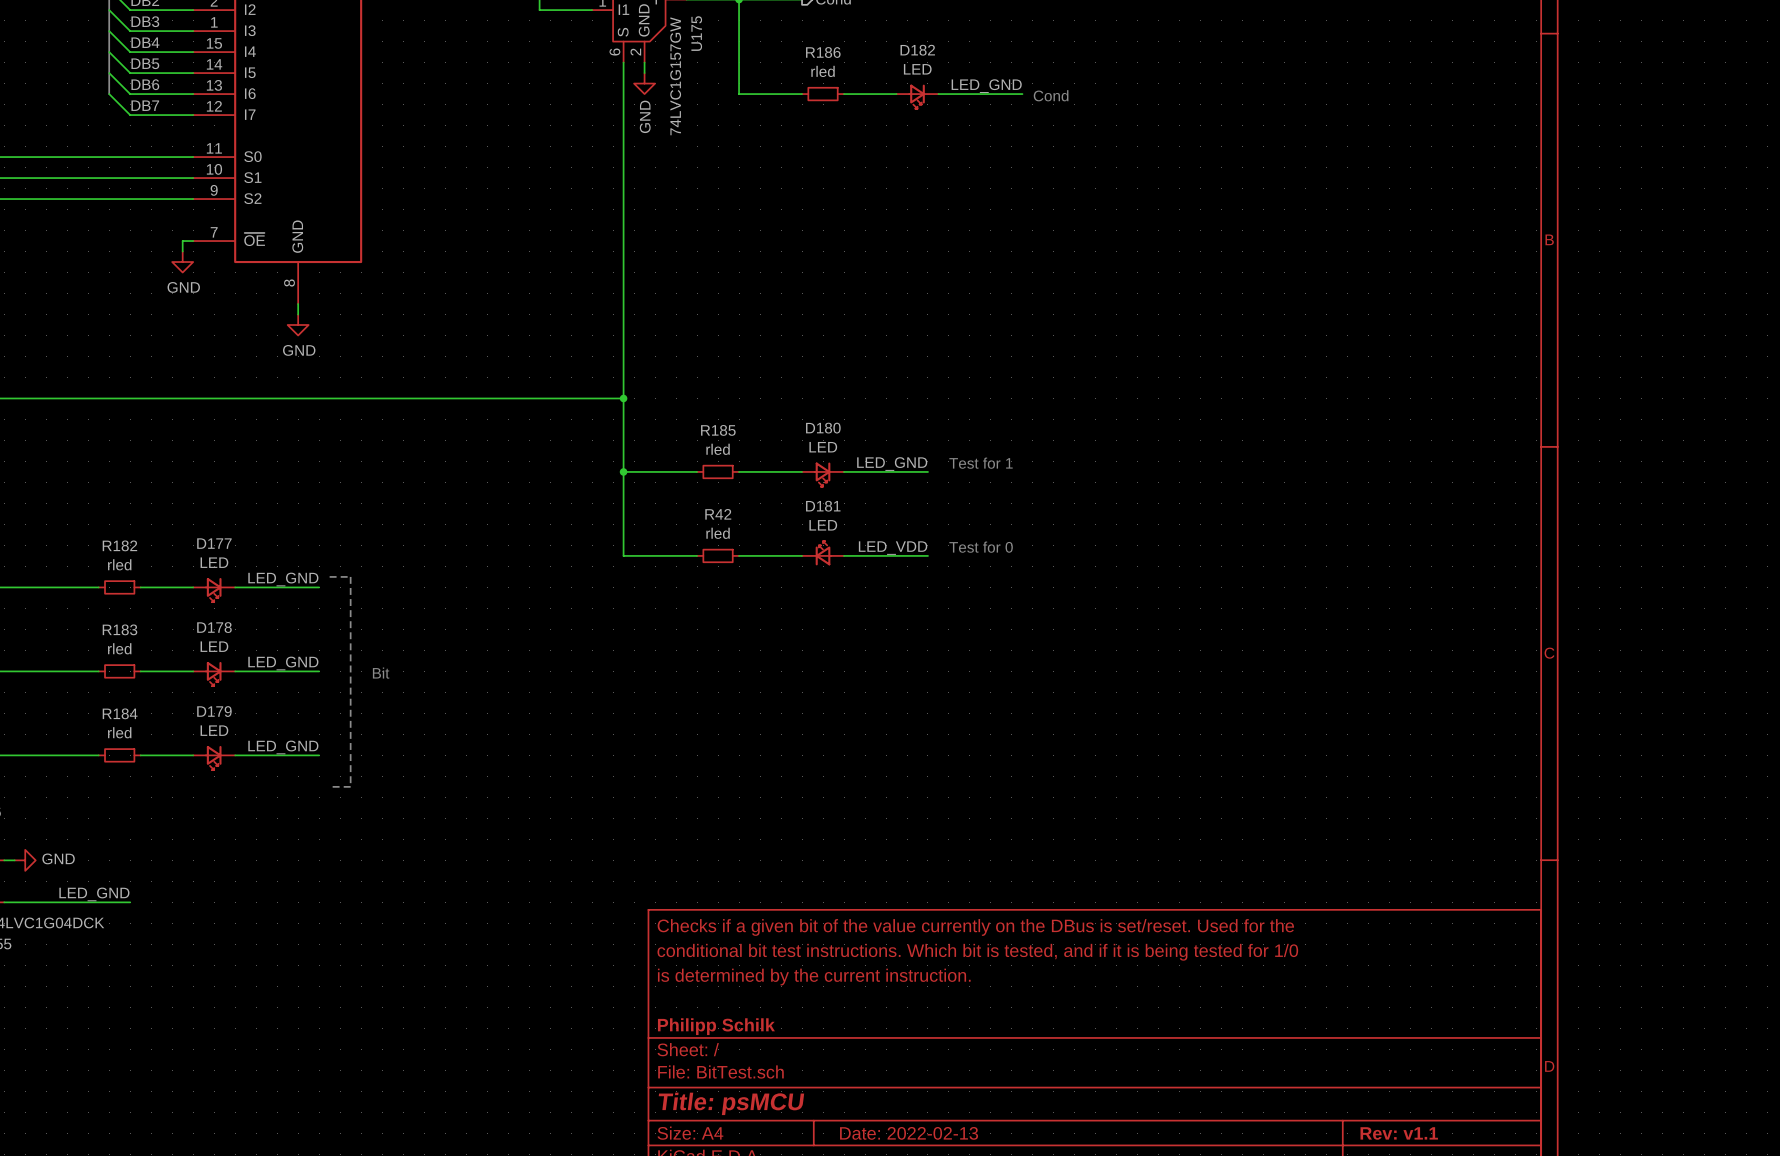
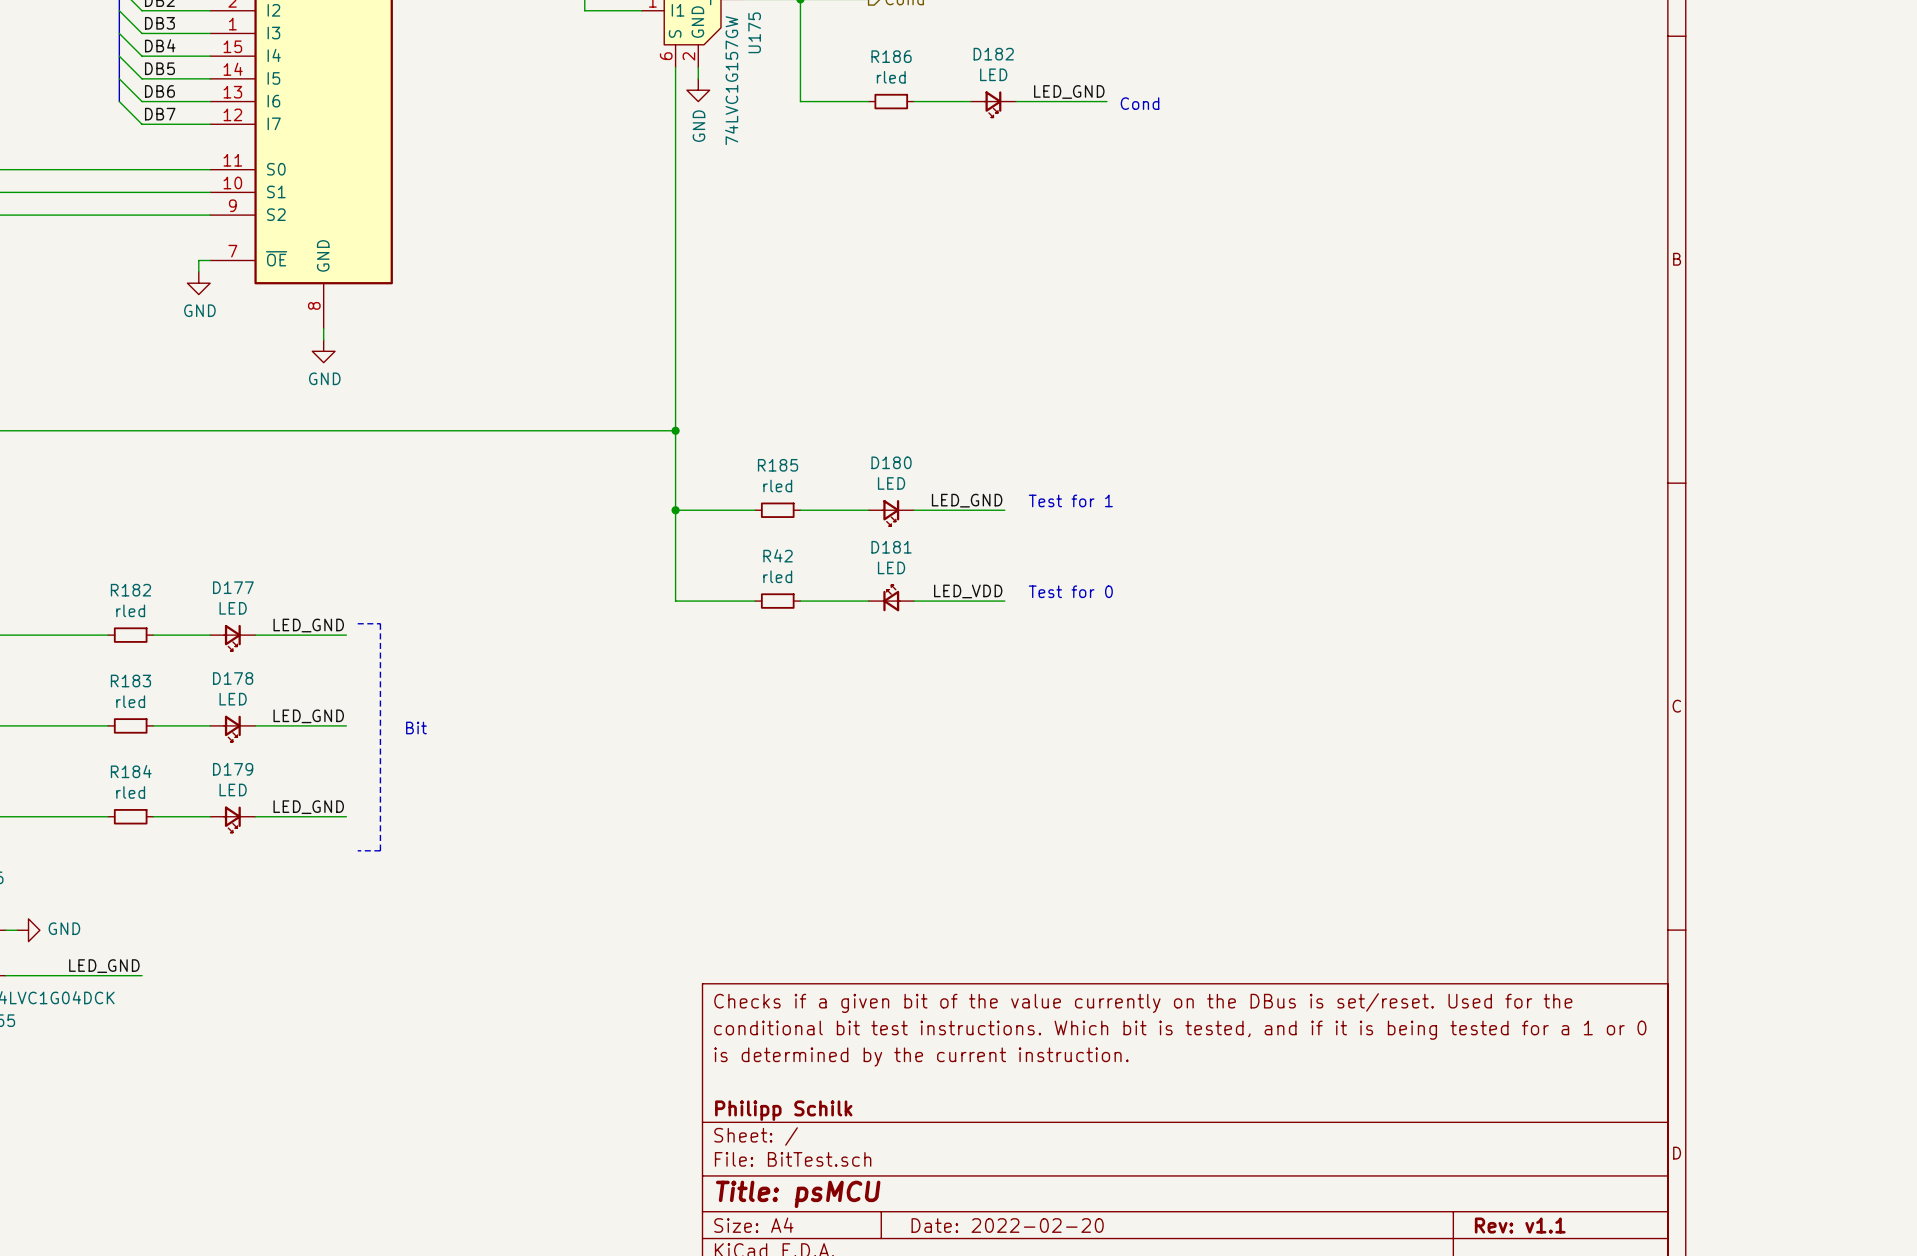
title block: conditional bit test instructions. Which bit is tested, and if it is being tested for 1/0 (977, 952) -> conditional bit test instructions. Which bit is tested, and if it is being tested for a 1 or 0 (1180, 1030)
title block: Date: 2022-02-13 (909, 1133) -> Date: 2022-02-20 (1007, 1225)

